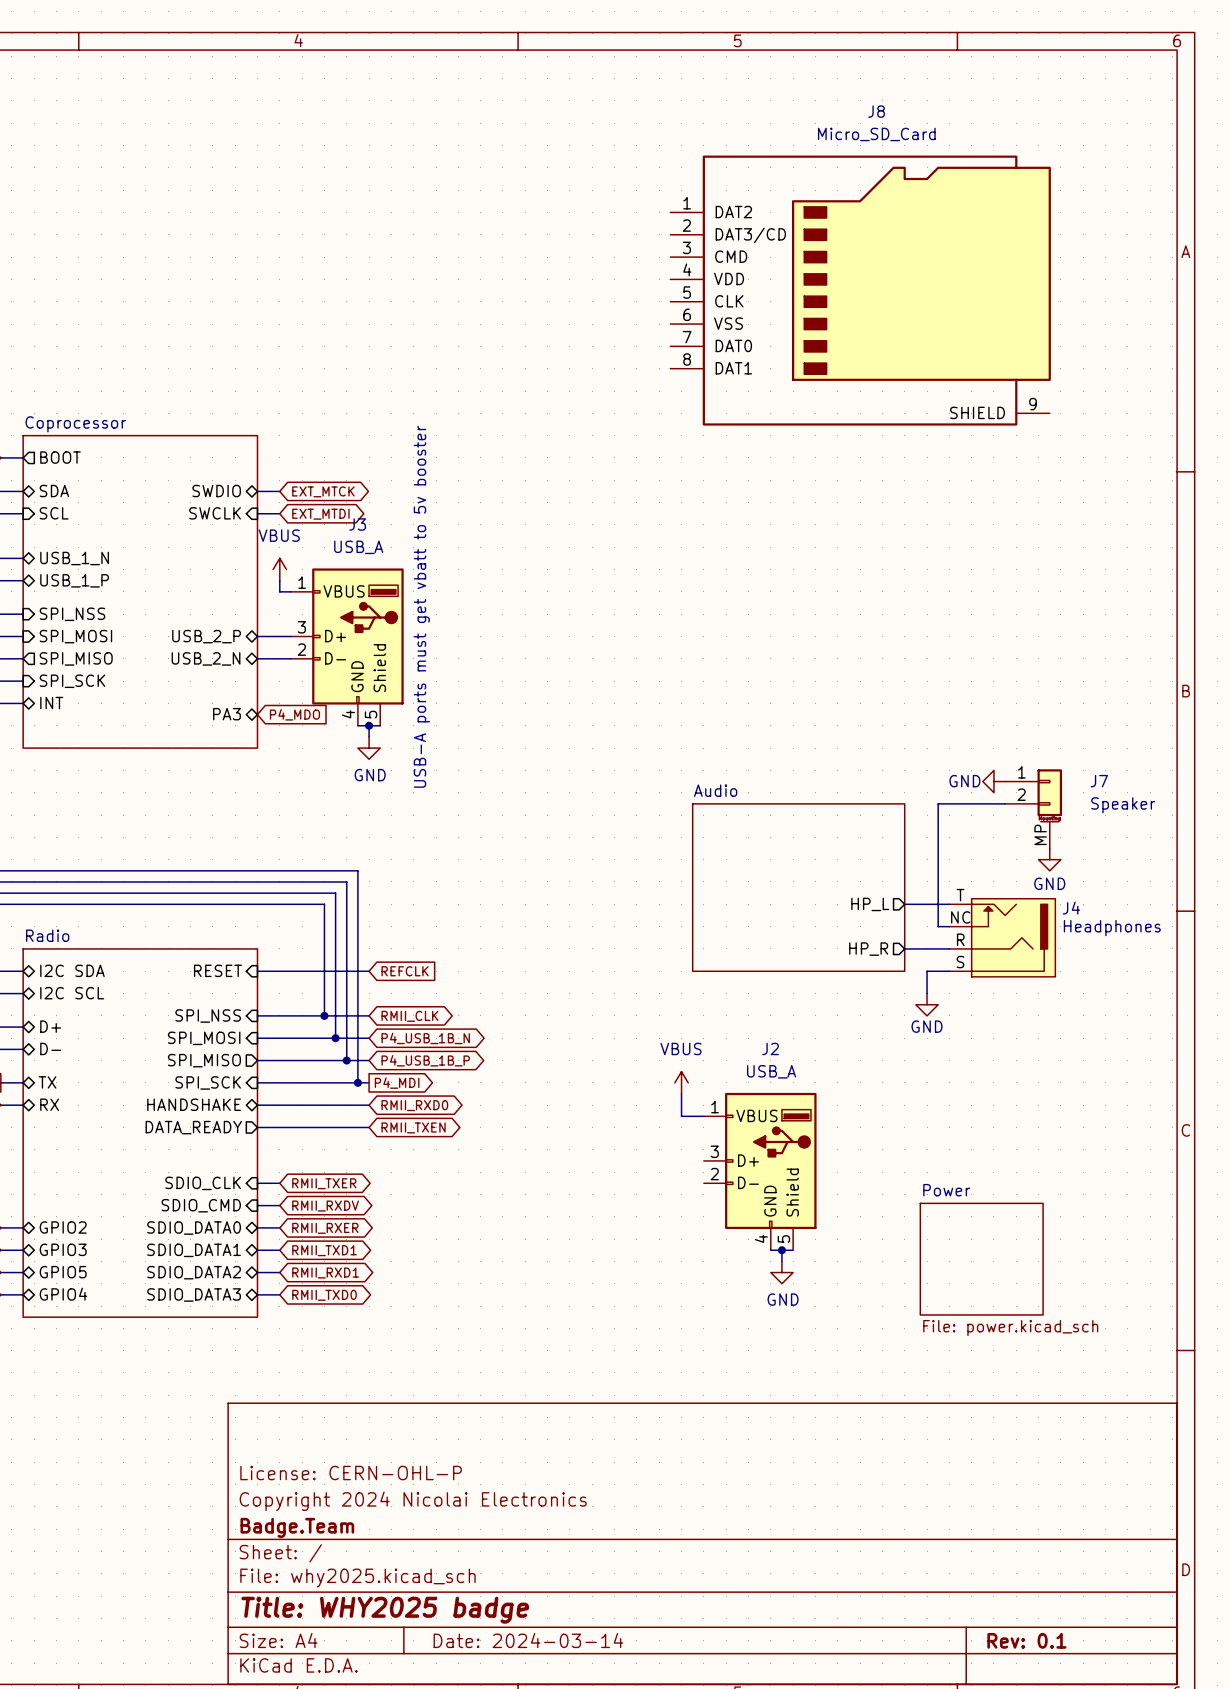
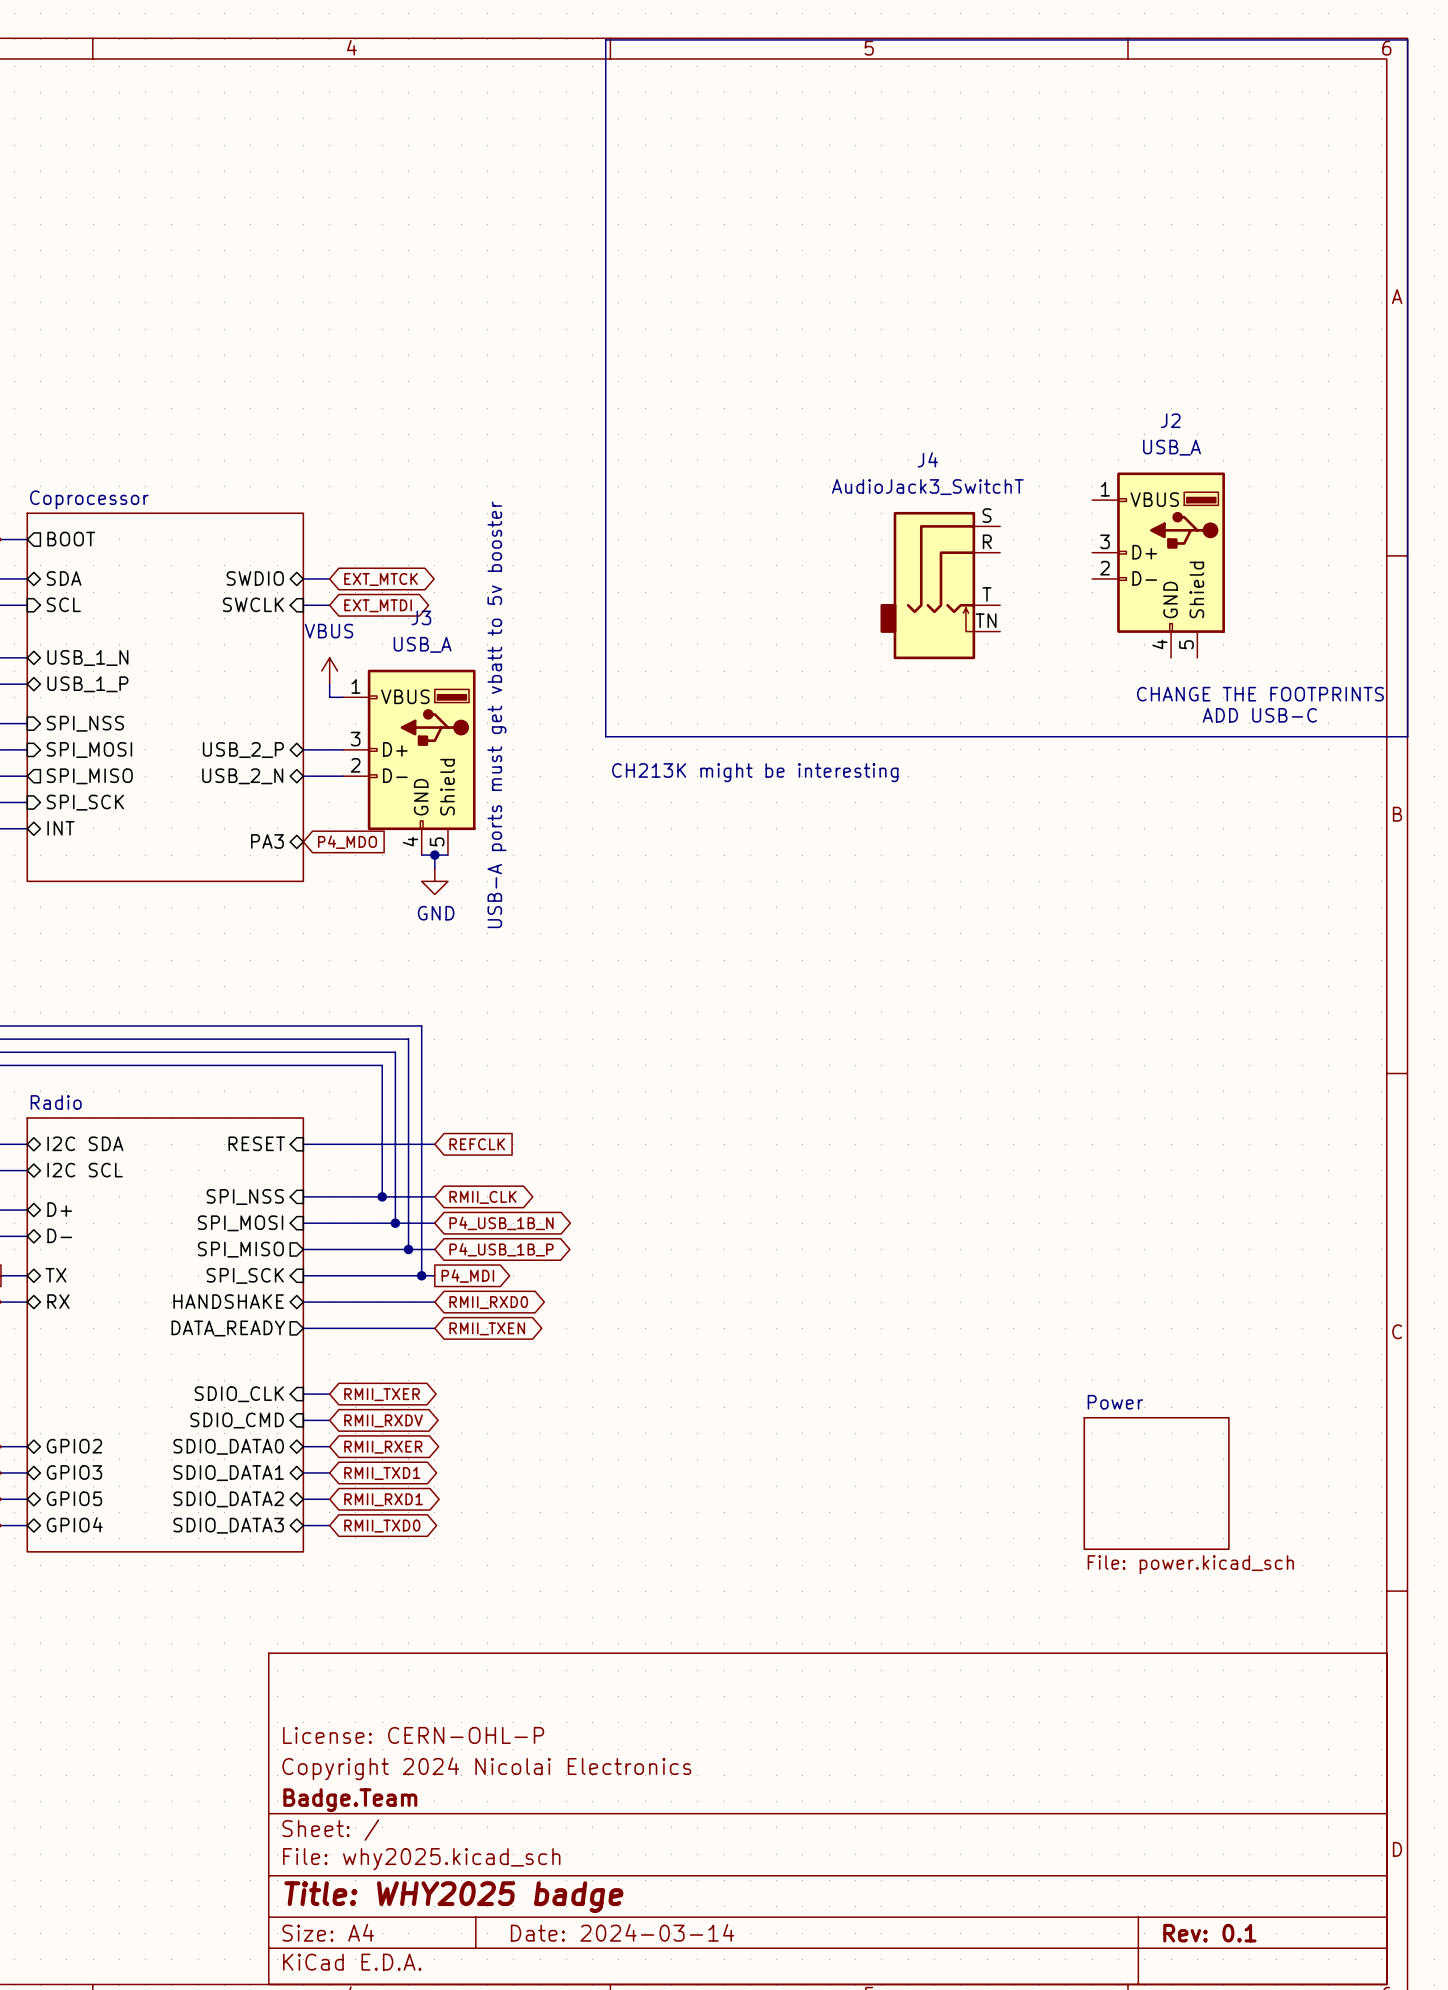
line: none -> (605, 39) (1407, 39) (1407, 736) (605, 736) (605, 39)
J8: Micro_SD_Card (860, 290) -> none
text: none -> CHANGE THE FOOTPRINTS (1260, 694)
text: none -> ADD USB-C (1259, 715)
text: none -> CH213K might be interesting (755, 772)
power symbol: GND (993, 781) -> none
wire: (1005, 803) (938, 803) (938, 926) (949, 926) -> none
J7: Speaker (1033, 808) -> none
power symbol: GND (1049, 859) -> none
sheet Audio: (798, 887) -> none
J4 symbol: [949, 898, 1056, 977] -> [880, 511, 1001, 660]
sheet pin: HP_L (870, 904) -> none
wire: (904, 904) (949, 904) -> none
J4 name position: J4 (1071, 908) -> J4 (927, 459)
J4 value: Headphones (1112, 928) -> AudioJack3_SwitchT (927, 487)
wire: (904, 948) (949, 948) -> none
sheet pin: HP_R (868, 949) -> none
wire: (949, 971) (927, 971) (927, 993) -> none
power symbol: GND (927, 1004) -> none
power symbol: VBUS (681, 1082) -> none
wire: (681, 1094) (681, 1116) (703, 1116) -> none
J2 position: (760, 1171) -> (1158, 565)
wire: (770, 1250) (793, 1250) -> none
wire: (781, 1250) (781, 1261) -> none
junction: (781, 1250) -> none
power symbol: GND (781, 1272) -> none

